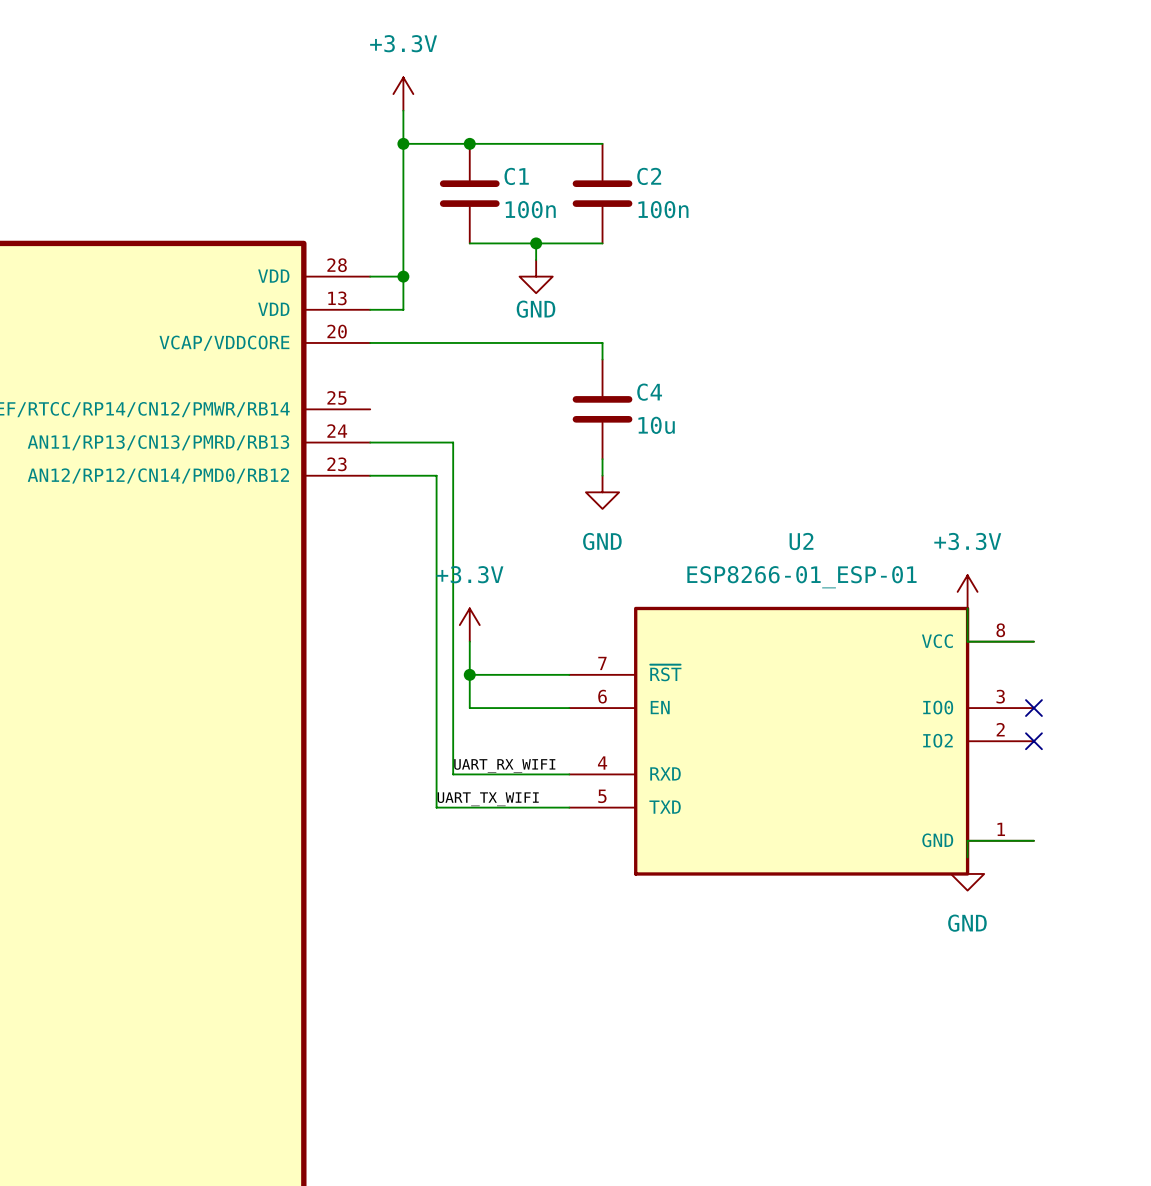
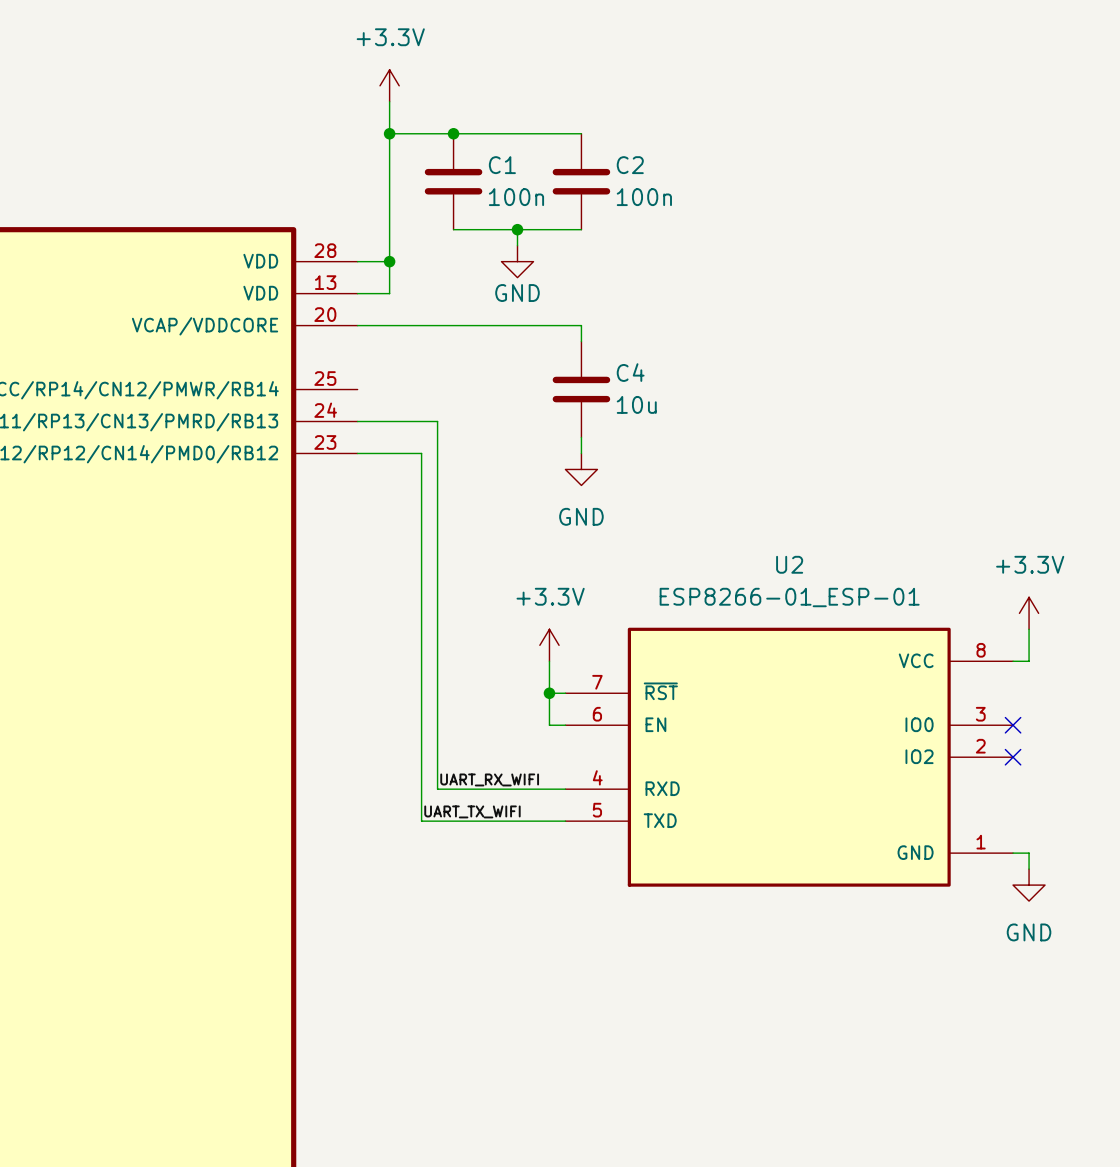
power symbol position: +3.3V (967, 591) -> +3.3V (1029, 613)
wire: (967, 608) (967, 641) (1033, 641) -> none
power symbol position: +3.3V (469, 625) -> +3.3V (549, 645)
wire: (469, 641) (469, 708) (569, 708) -> none
wire: none -> (1029, 629) (1029, 661) (1013, 661)
wire: (469, 674) (569, 674) -> none
junction: (469, 674) -> none
wire: none -> (549, 661) (549, 725) (565, 725)
no-connect mark: (1033, 708) -> none
wire: none -> (549, 693) (565, 693)
junction: none -> (549, 693)
U2 position: (801, 741) -> (789, 757)
no-connect mark position: (1033, 741) -> (1013, 725)
label position: UART_RX_WIFI (504, 766) -> UART_RX_WIFI (489, 779)
wire: (453, 774) (569, 774) -> (437, 741) (437, 789) (565, 789)
no-connect mark: none -> (1013, 757)
label position: UART_TX_WIFI (488, 799) -> UART_TX_WIFI (472, 811)
wire: (436, 807) (569, 807) -> (421, 773) (421, 821) (565, 821)
wire: (1033, 840) (967, 840) (967, 857) -> none
power symbol position: GND (967, 873) -> GND (1029, 885)
wire: none -> (1013, 853) (1029, 853) (1029, 869)

